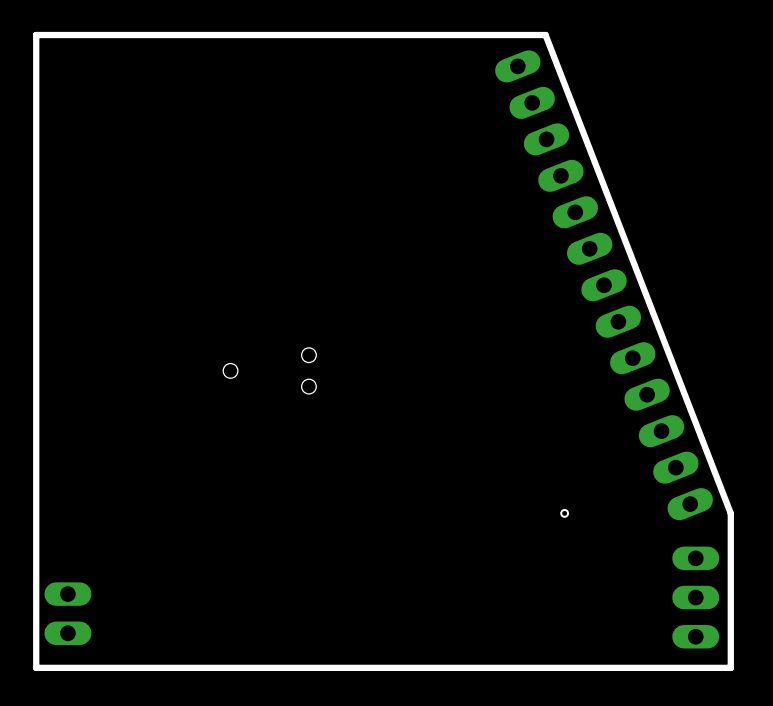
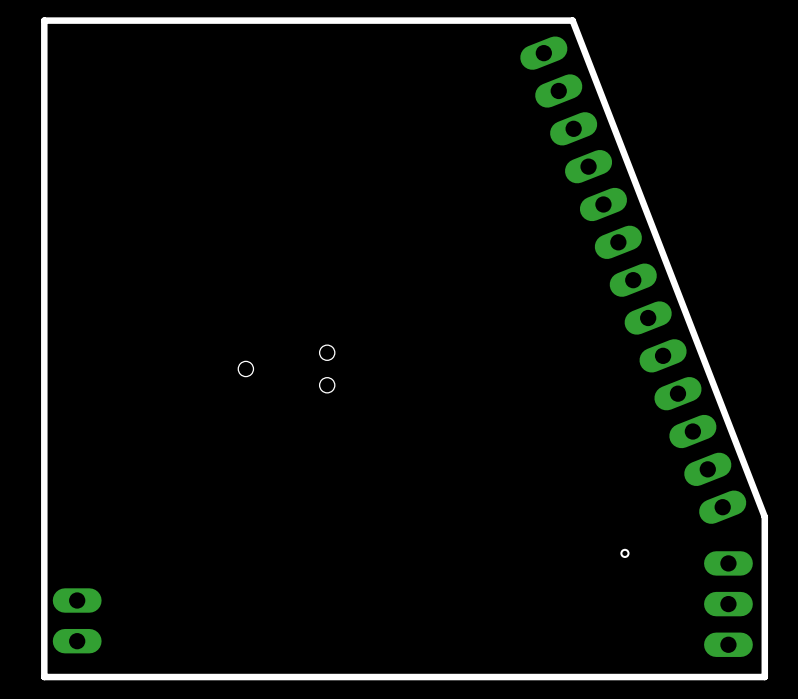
part position: (564, 513) -> (624, 553)

